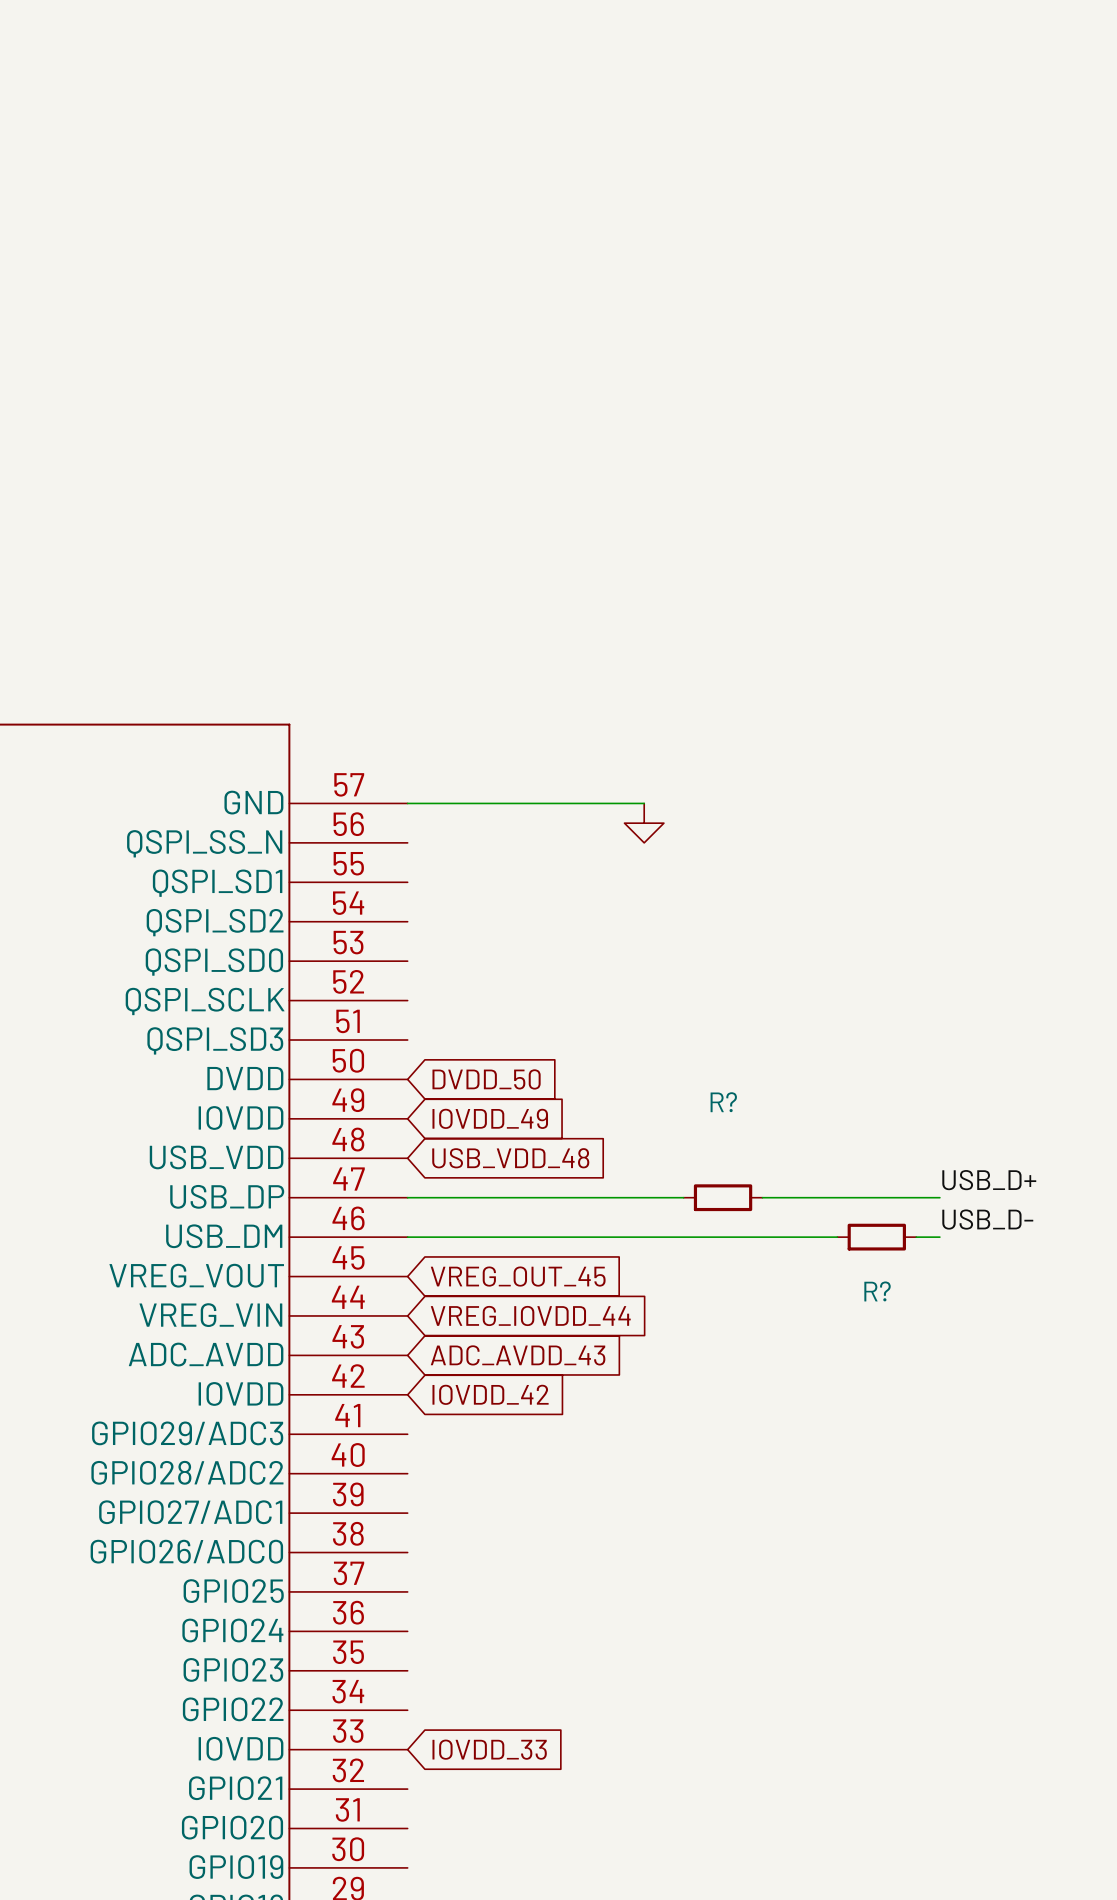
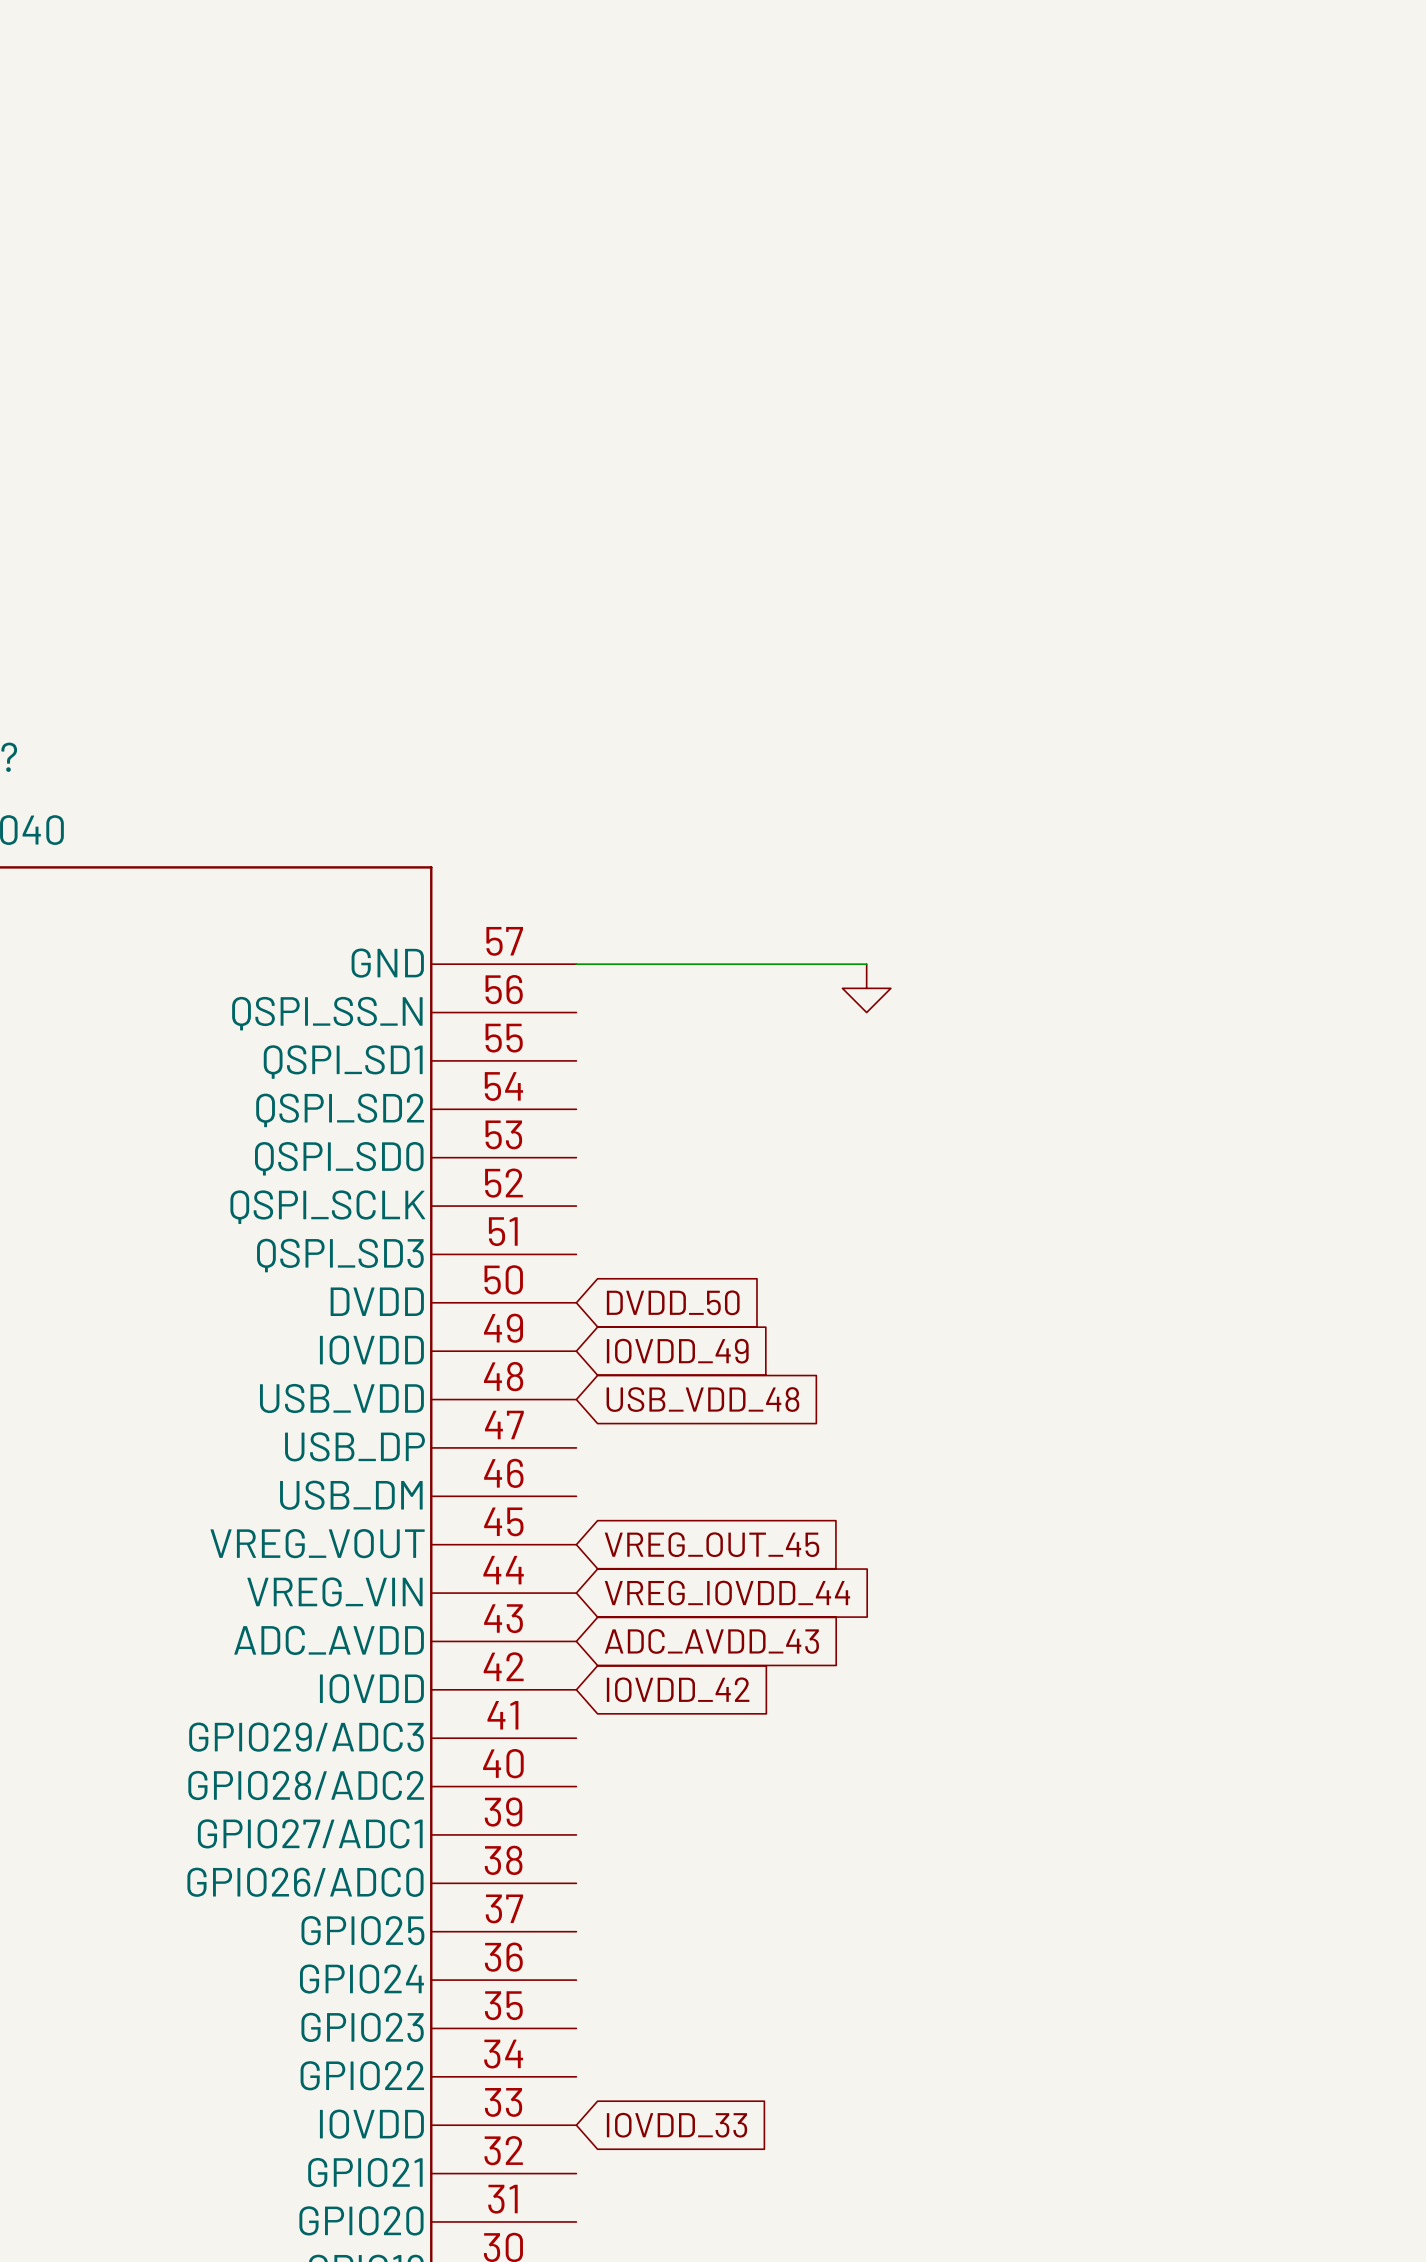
label: USB_D+ (989, 1180) -> none
wire: (407, 1197) (683, 1197) -> none
R?: (723, 1197) -> none
wire: (762, 1197) (939, 1197) -> none
label: USB_D- (987, 1219) -> none
wire: (407, 1237) (837, 1237) -> none
R?: (876, 1237) -> none
wire: (916, 1237) (939, 1237) -> none

